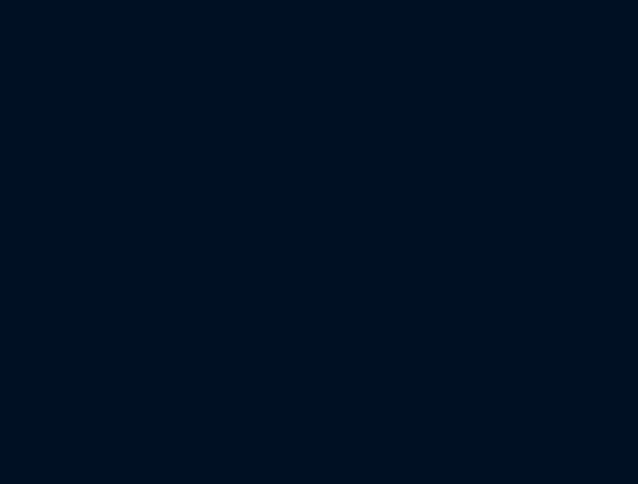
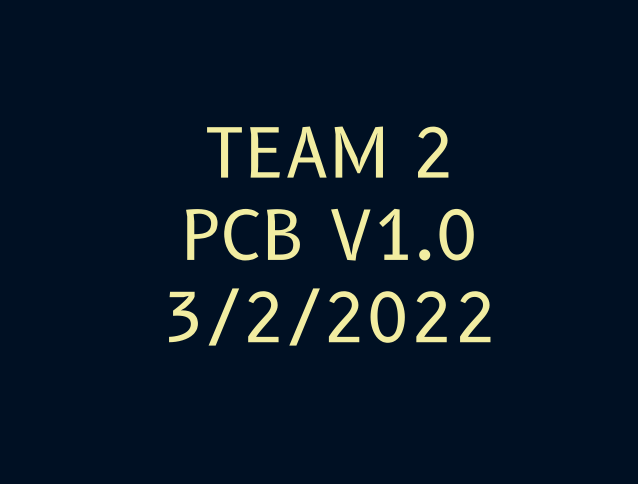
text: none -> TEAM 2 (327, 152)
text: none -> PCB V1.0 (329, 234)
text: none -> 3/2/2022 (329, 317)

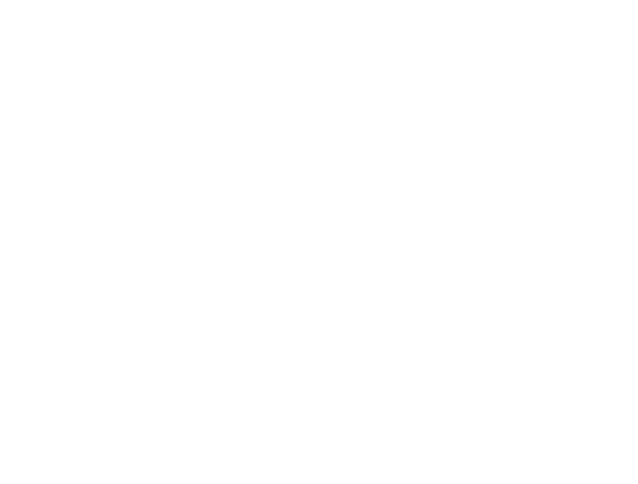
text: TEAM 2 (327, 152) -> none
text: PCB V1.0 (329, 234) -> none
text: 3/2/2022 (329, 317) -> none

